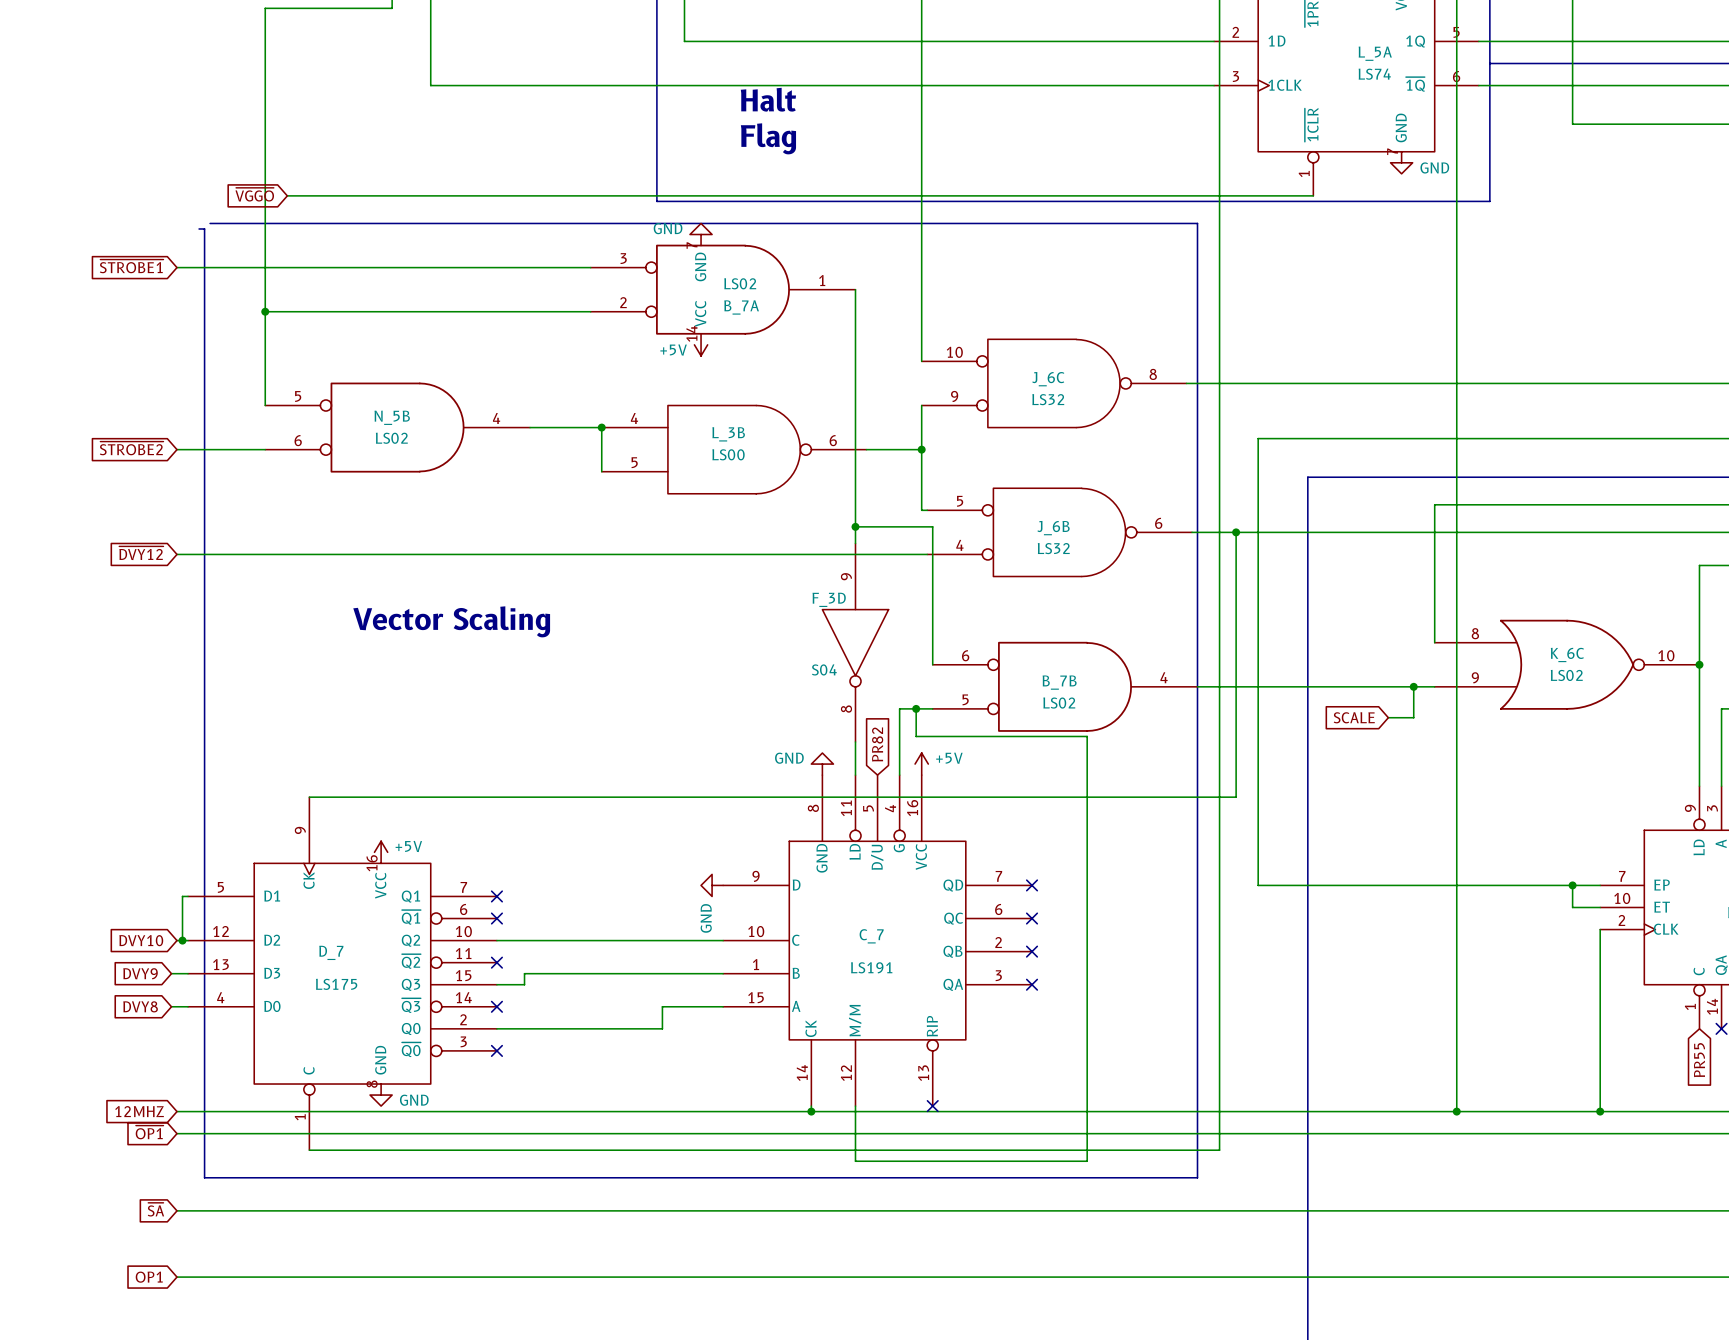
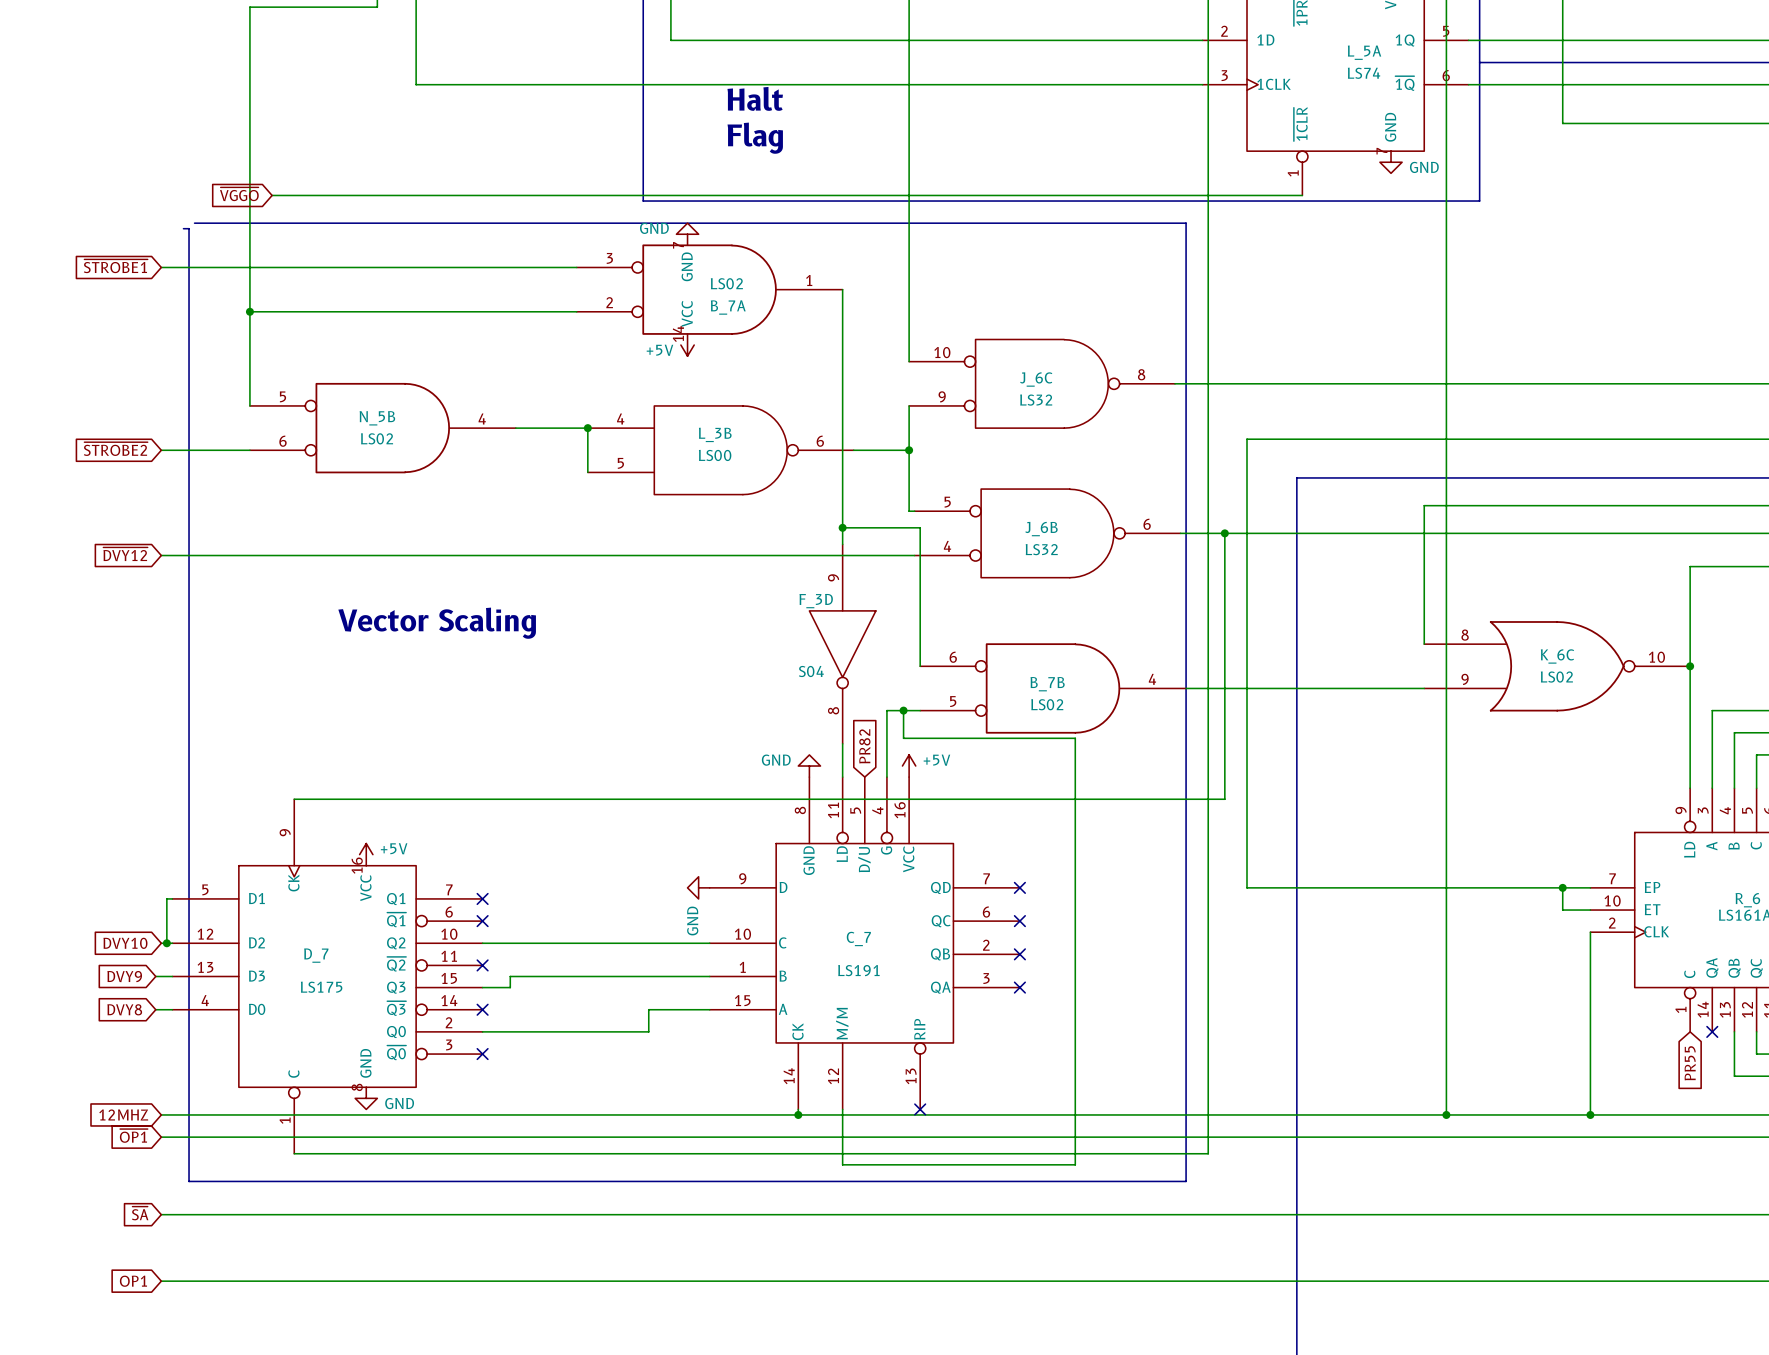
wire: (1413, 686) (1413, 717) (1388, 717) -> none
junction: (1413, 686) -> none
global label: SCALE (1354, 717) -> none

